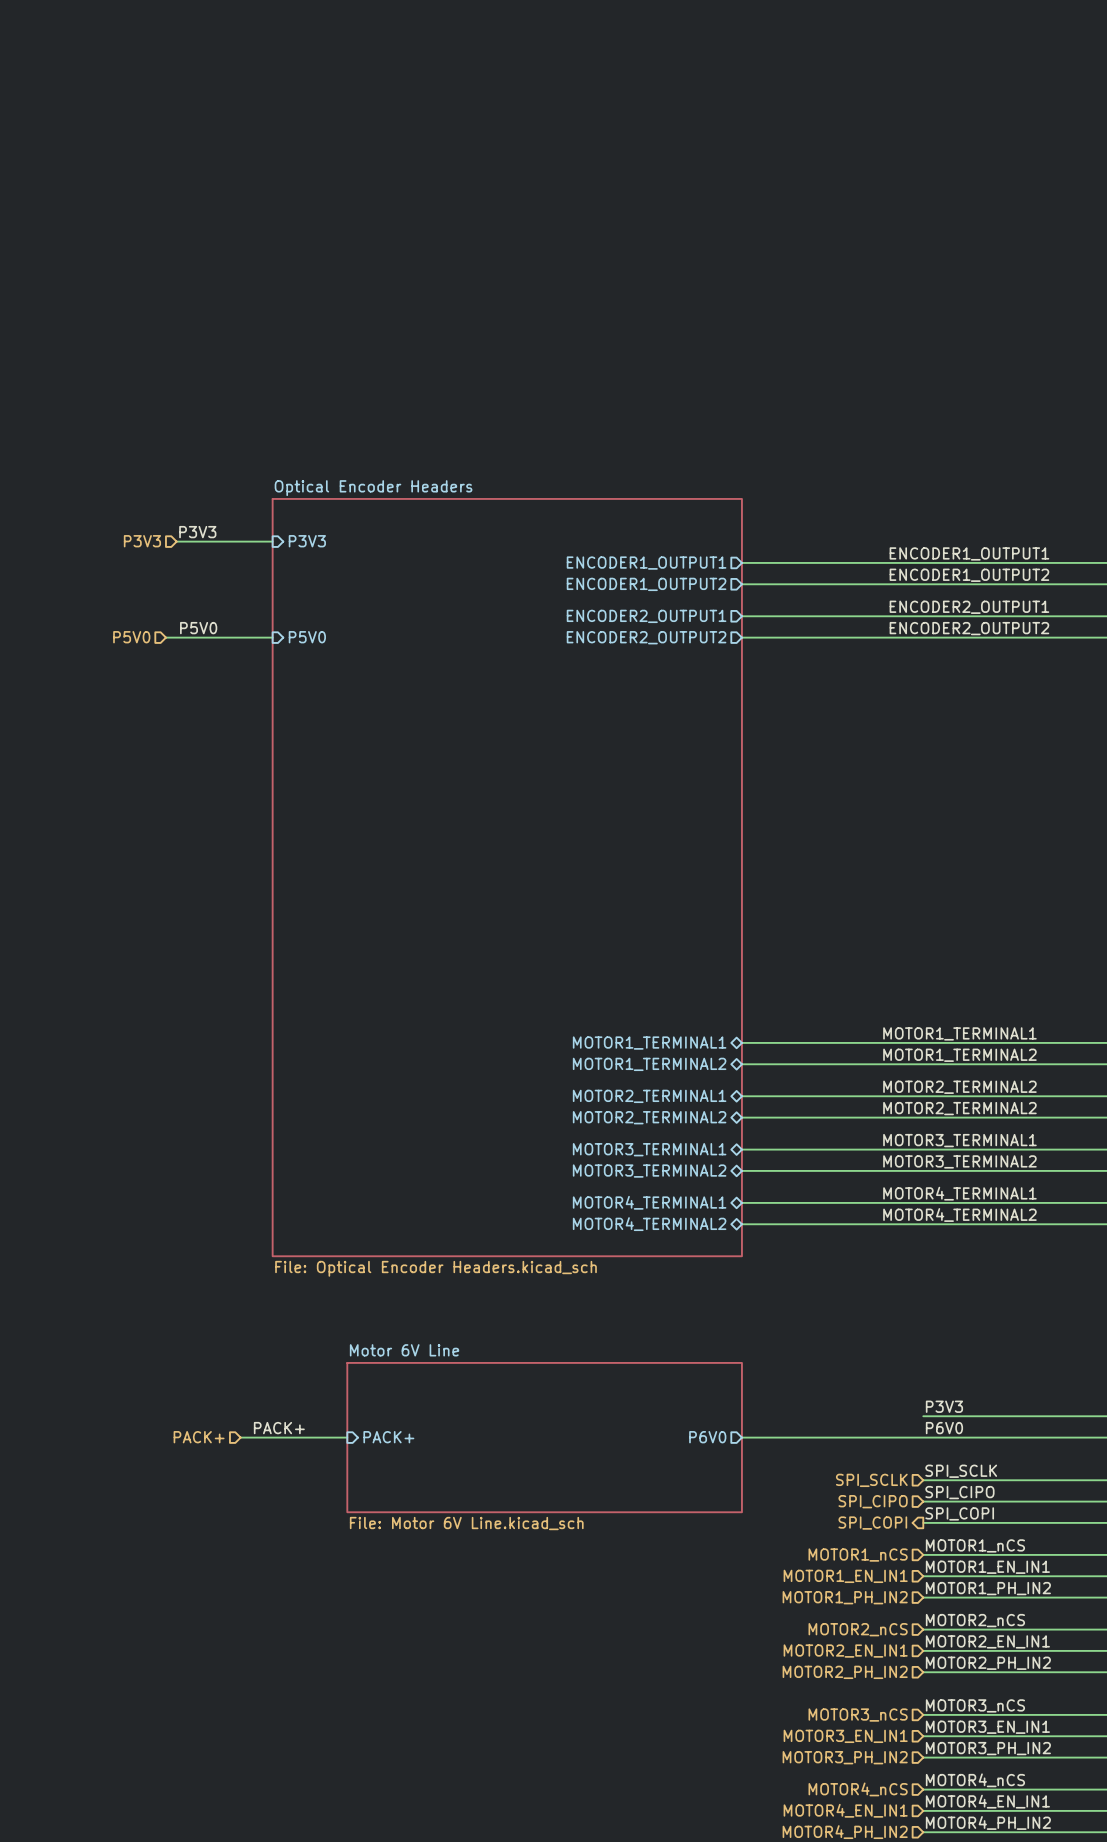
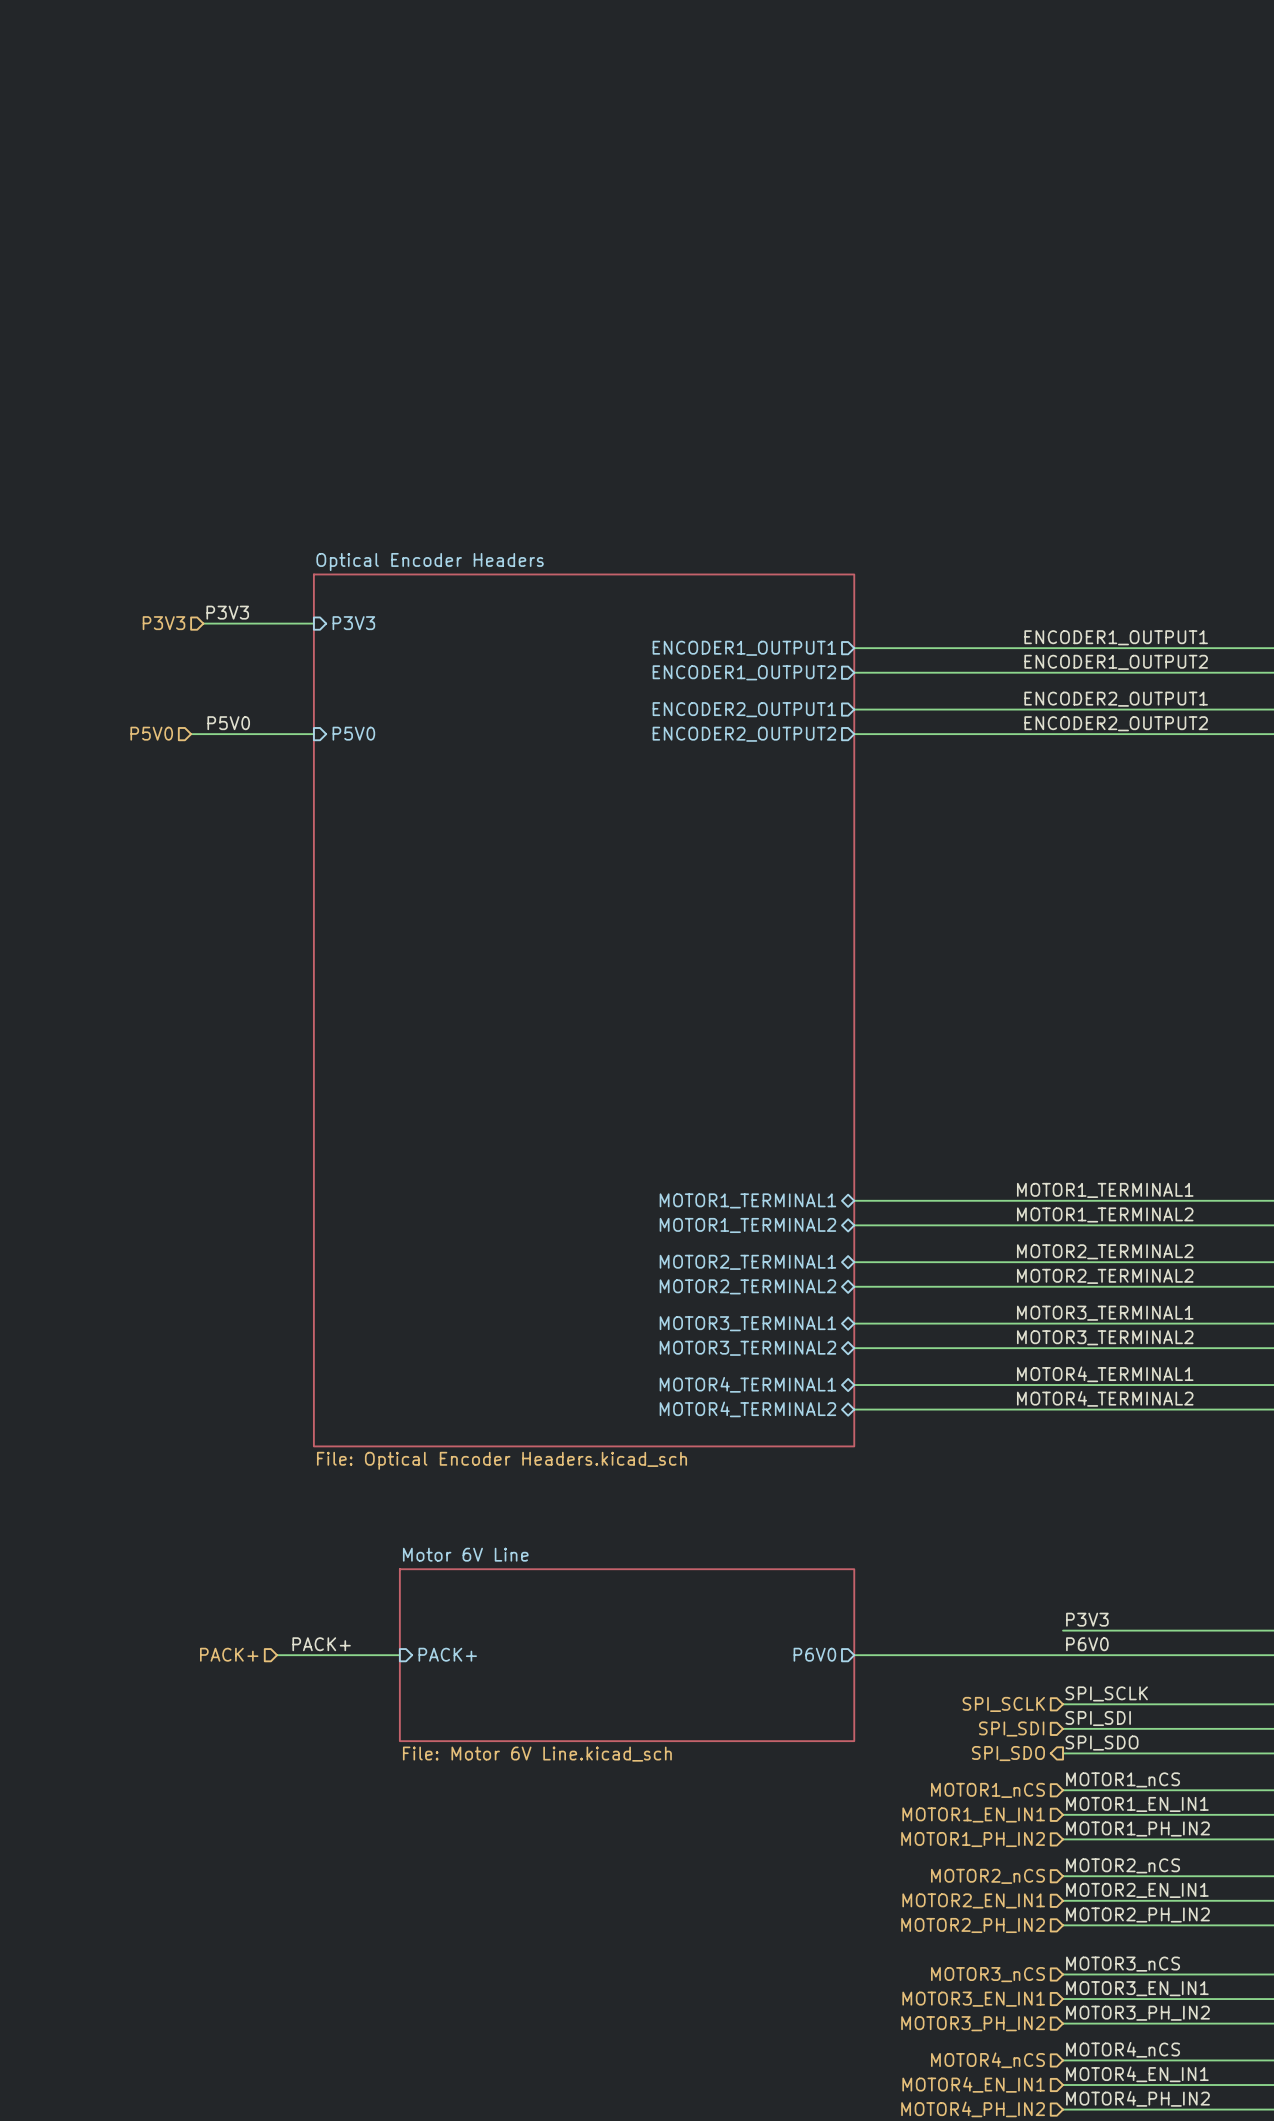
label: SPI_CIPO (959, 1492) -> SPI_SDI (1098, 1718)
hierarchical label: SPI_CIPO (873, 1501) -> SPI_SDI (1011, 1728)
label: SPI_COPI (959, 1513) -> SPI_SDO (1102, 1743)
hierarchical label: SPI_COPI (872, 1523) -> SPI_SDO (1008, 1753)

